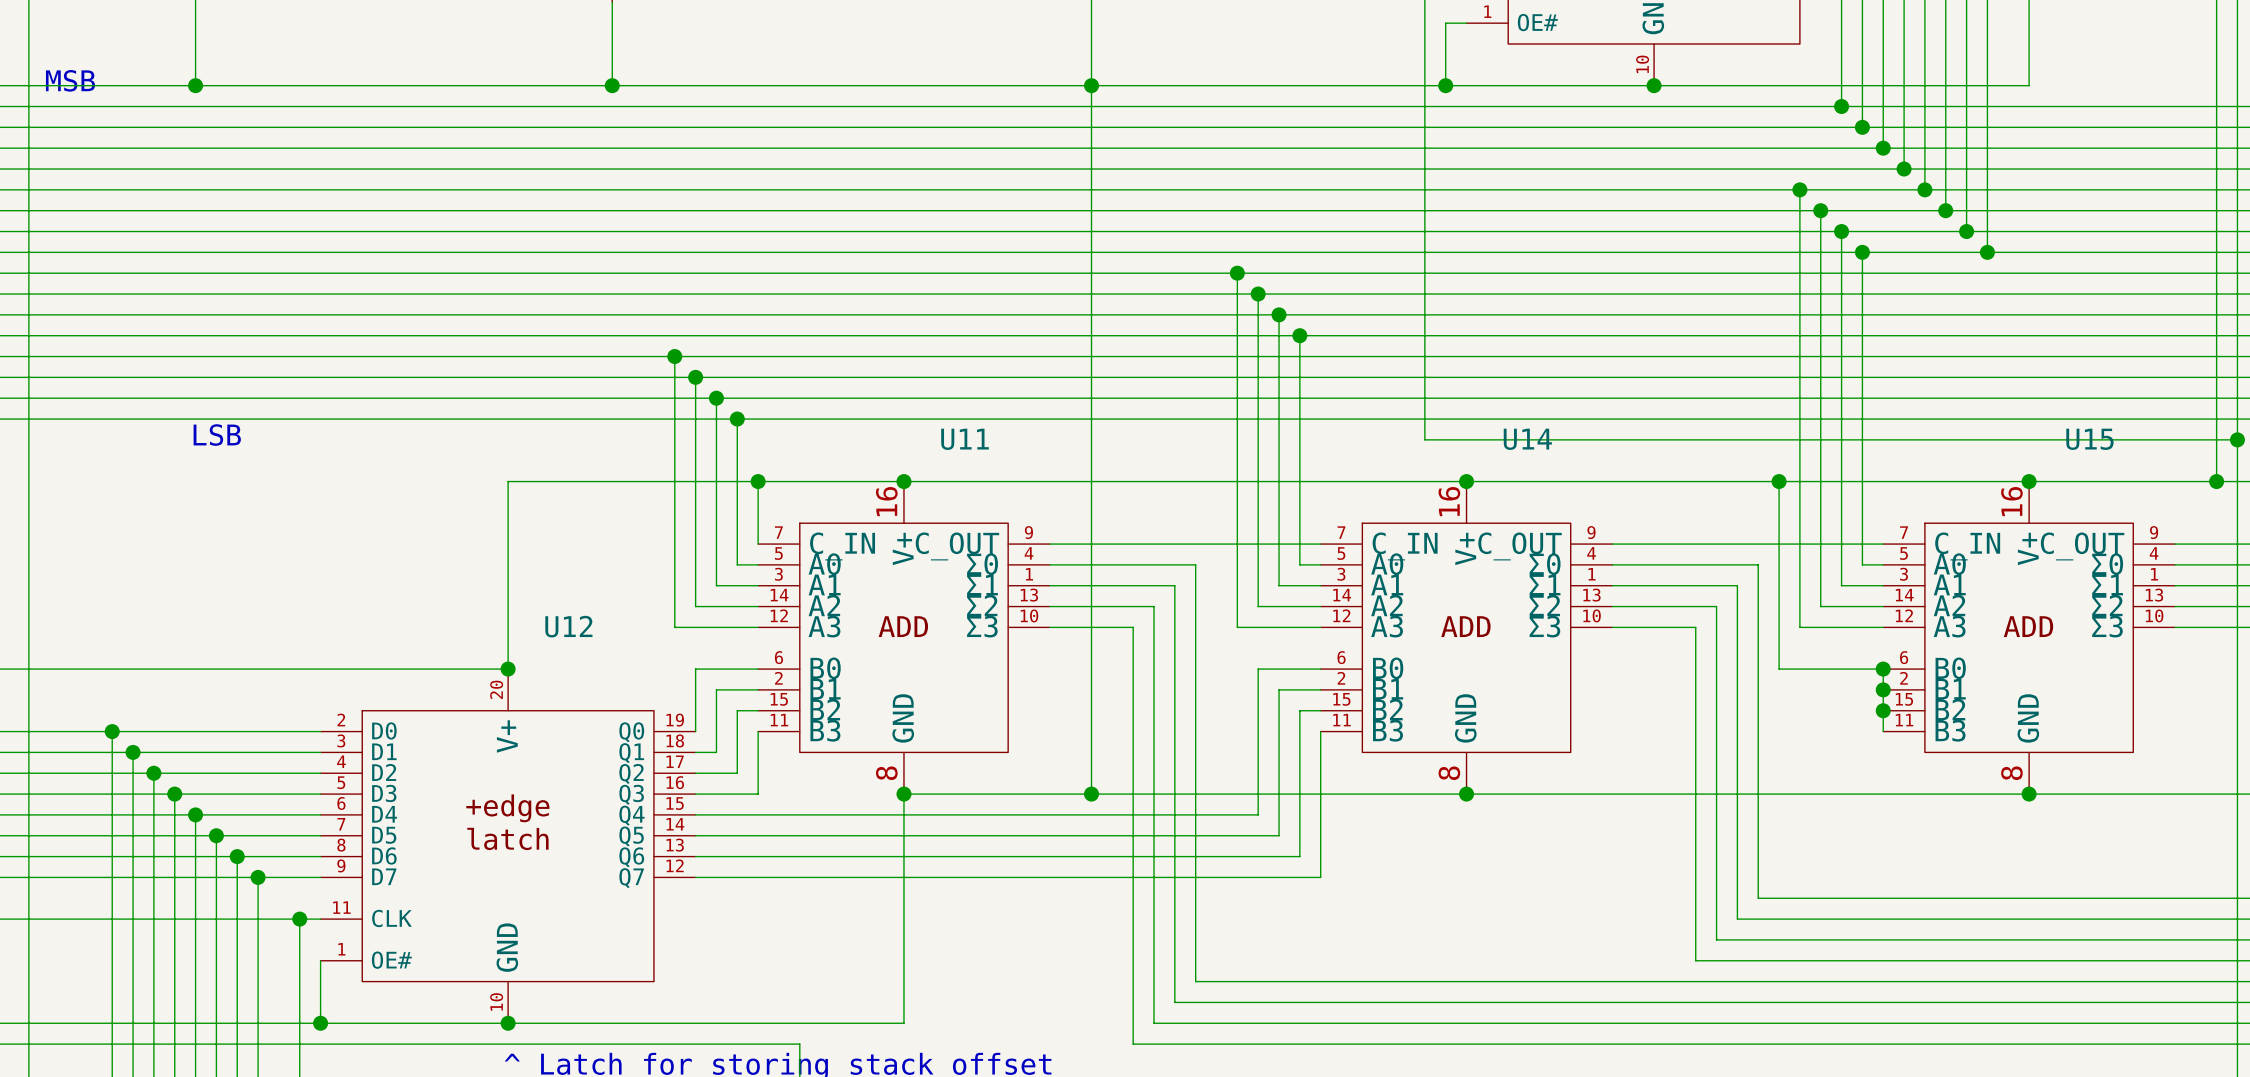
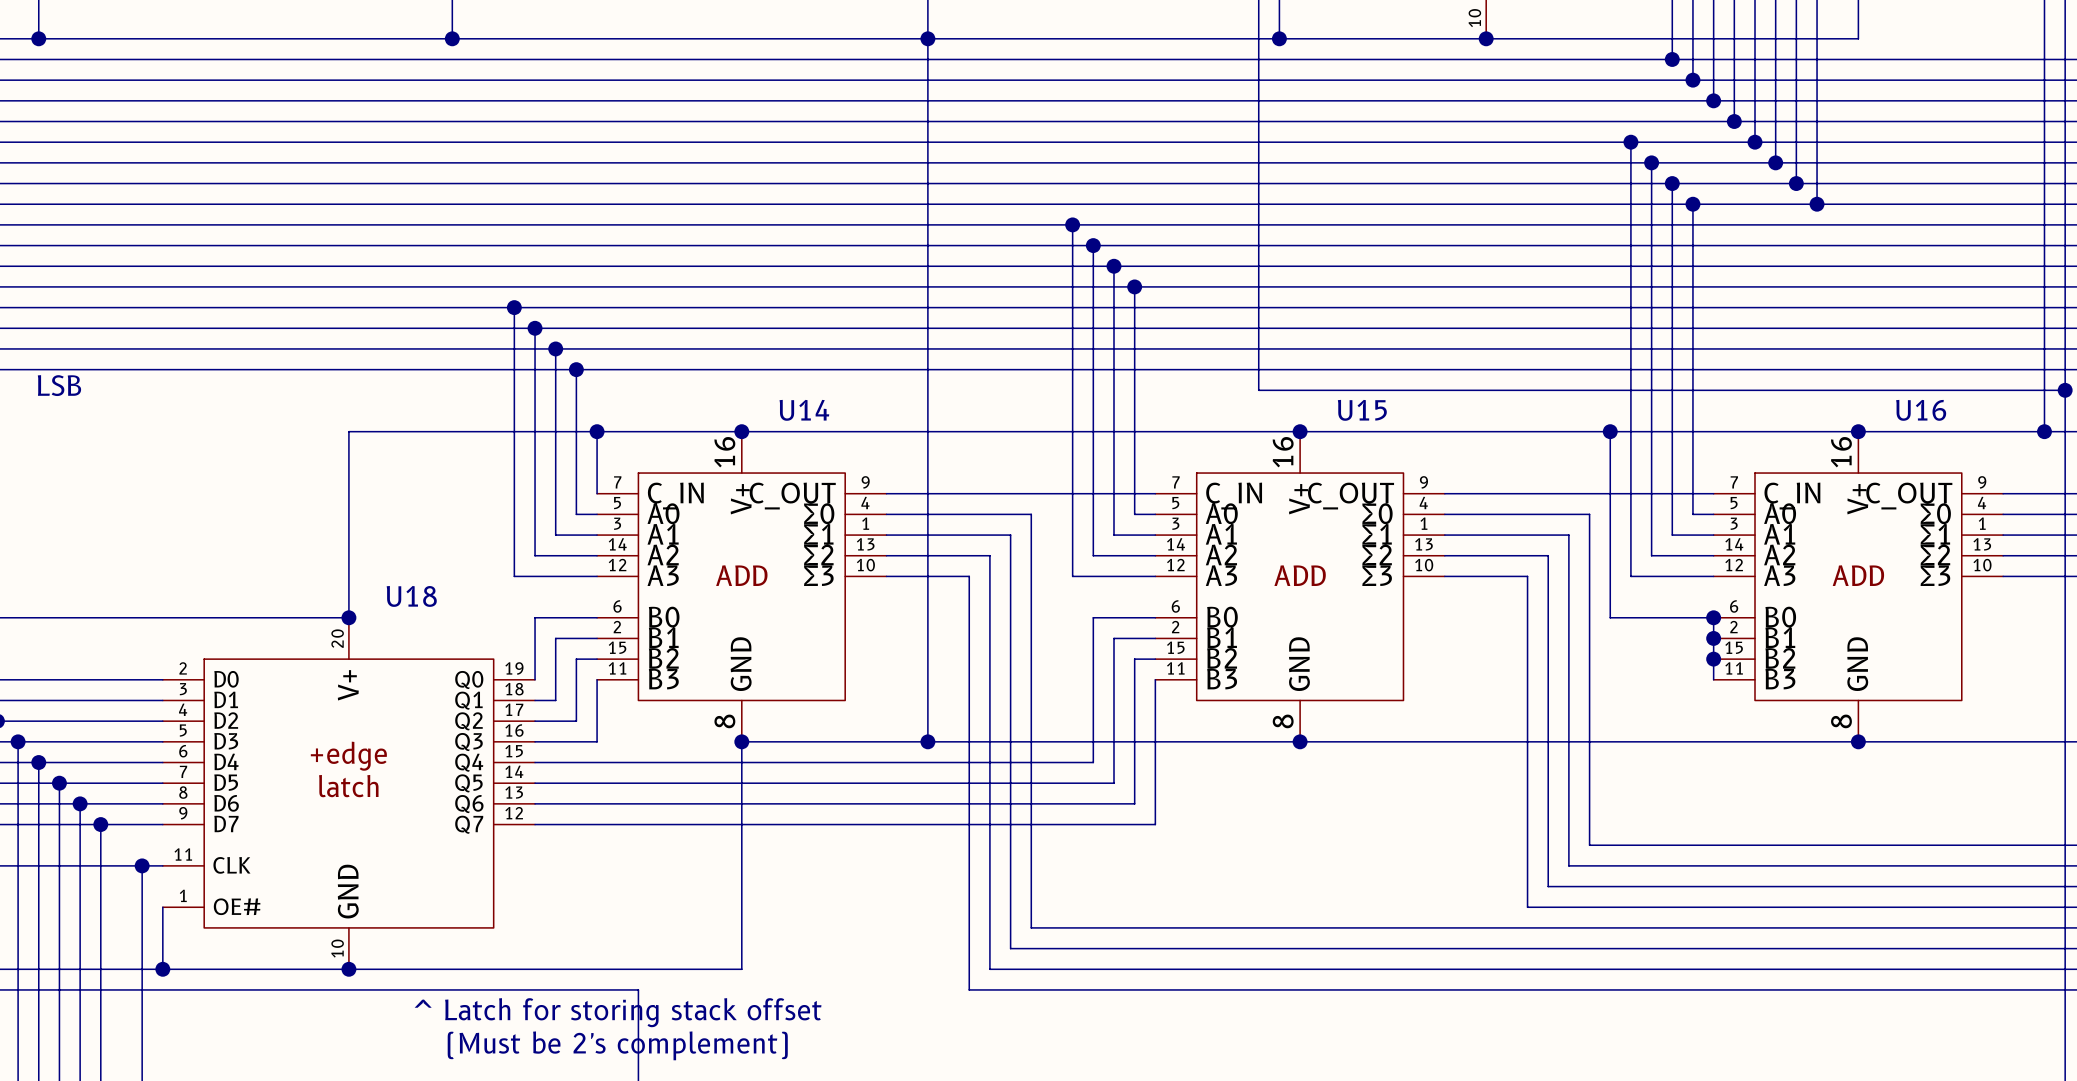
U11 name: U11 (965, 439) -> U14 (804, 410)
U14 name: U14 (1527, 439) -> U15 (1362, 410)
U15 name: U15 (2089, 439) -> U16 (1921, 410)
U12 name: U12 (568, 626) -> U18 (411, 596)

